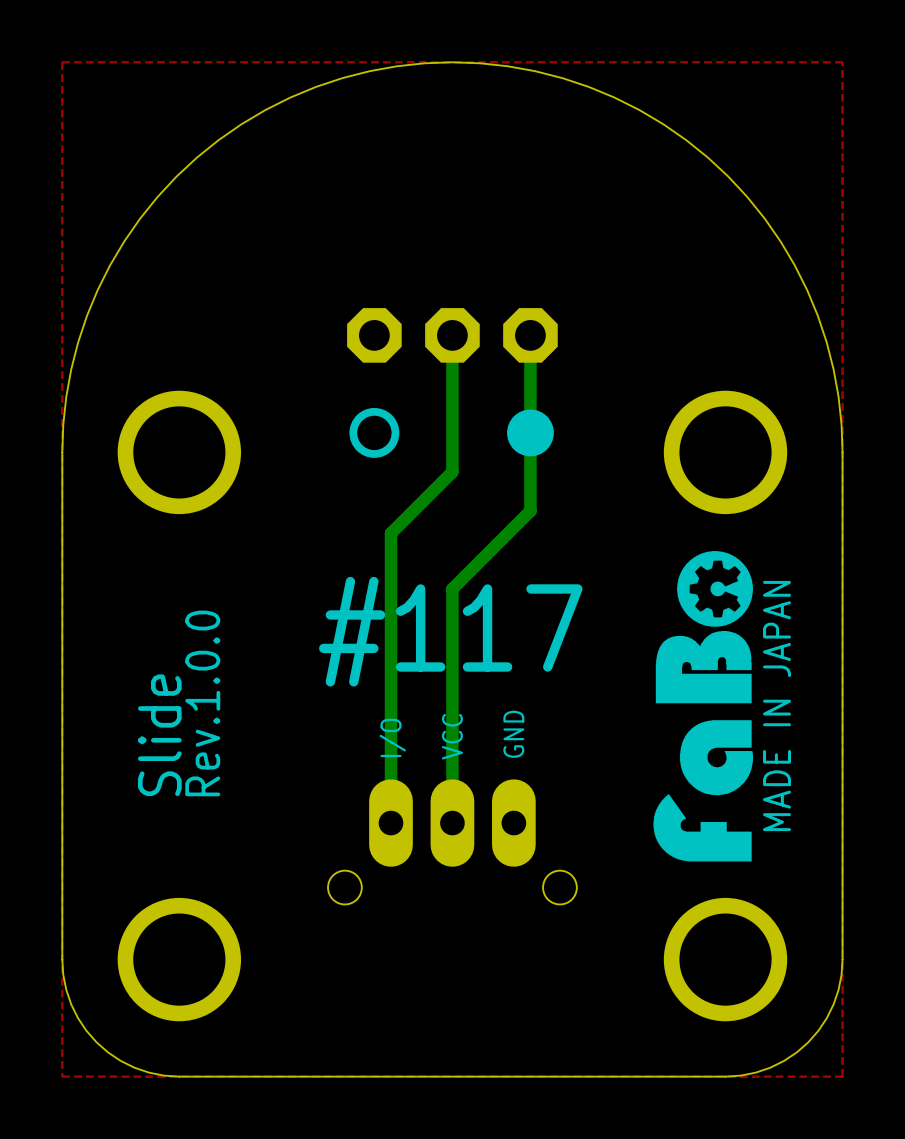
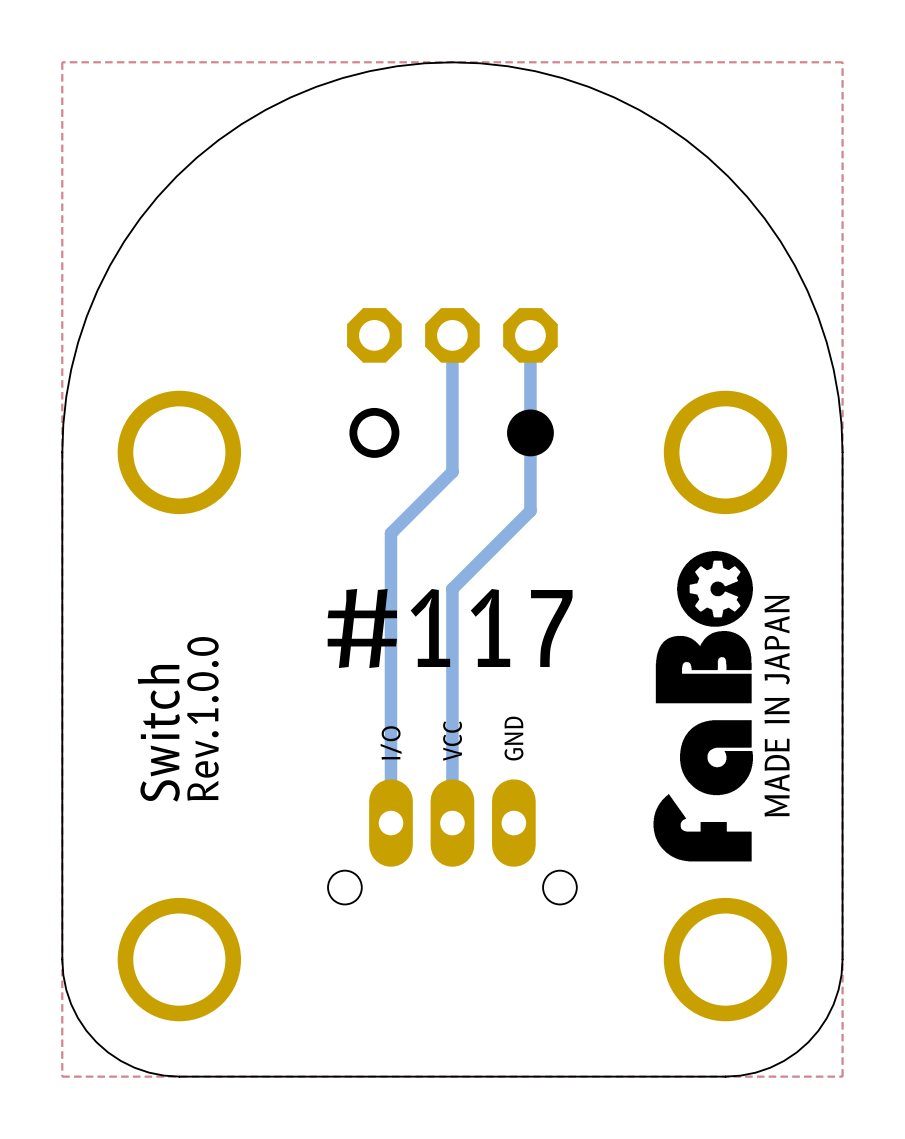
text: Slide (159, 735) -> Switch (158, 733)

